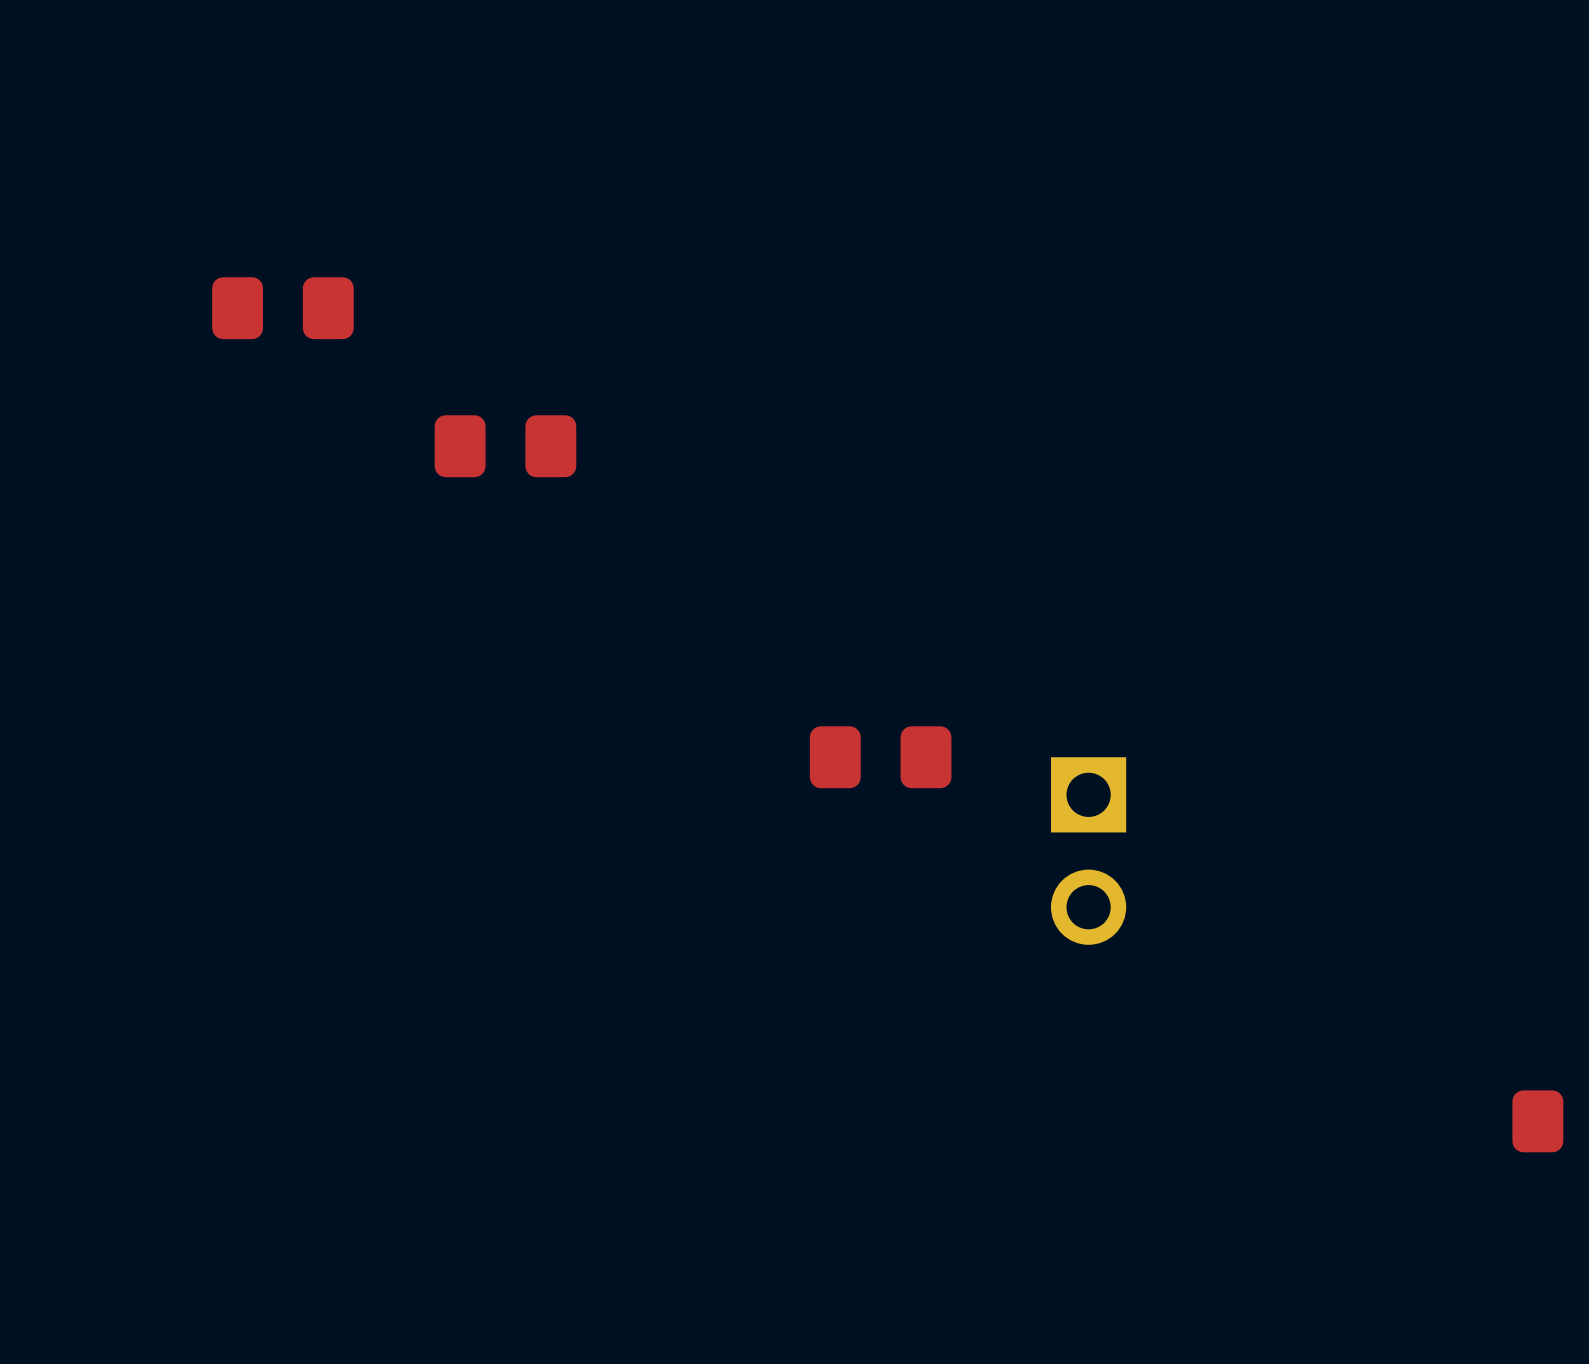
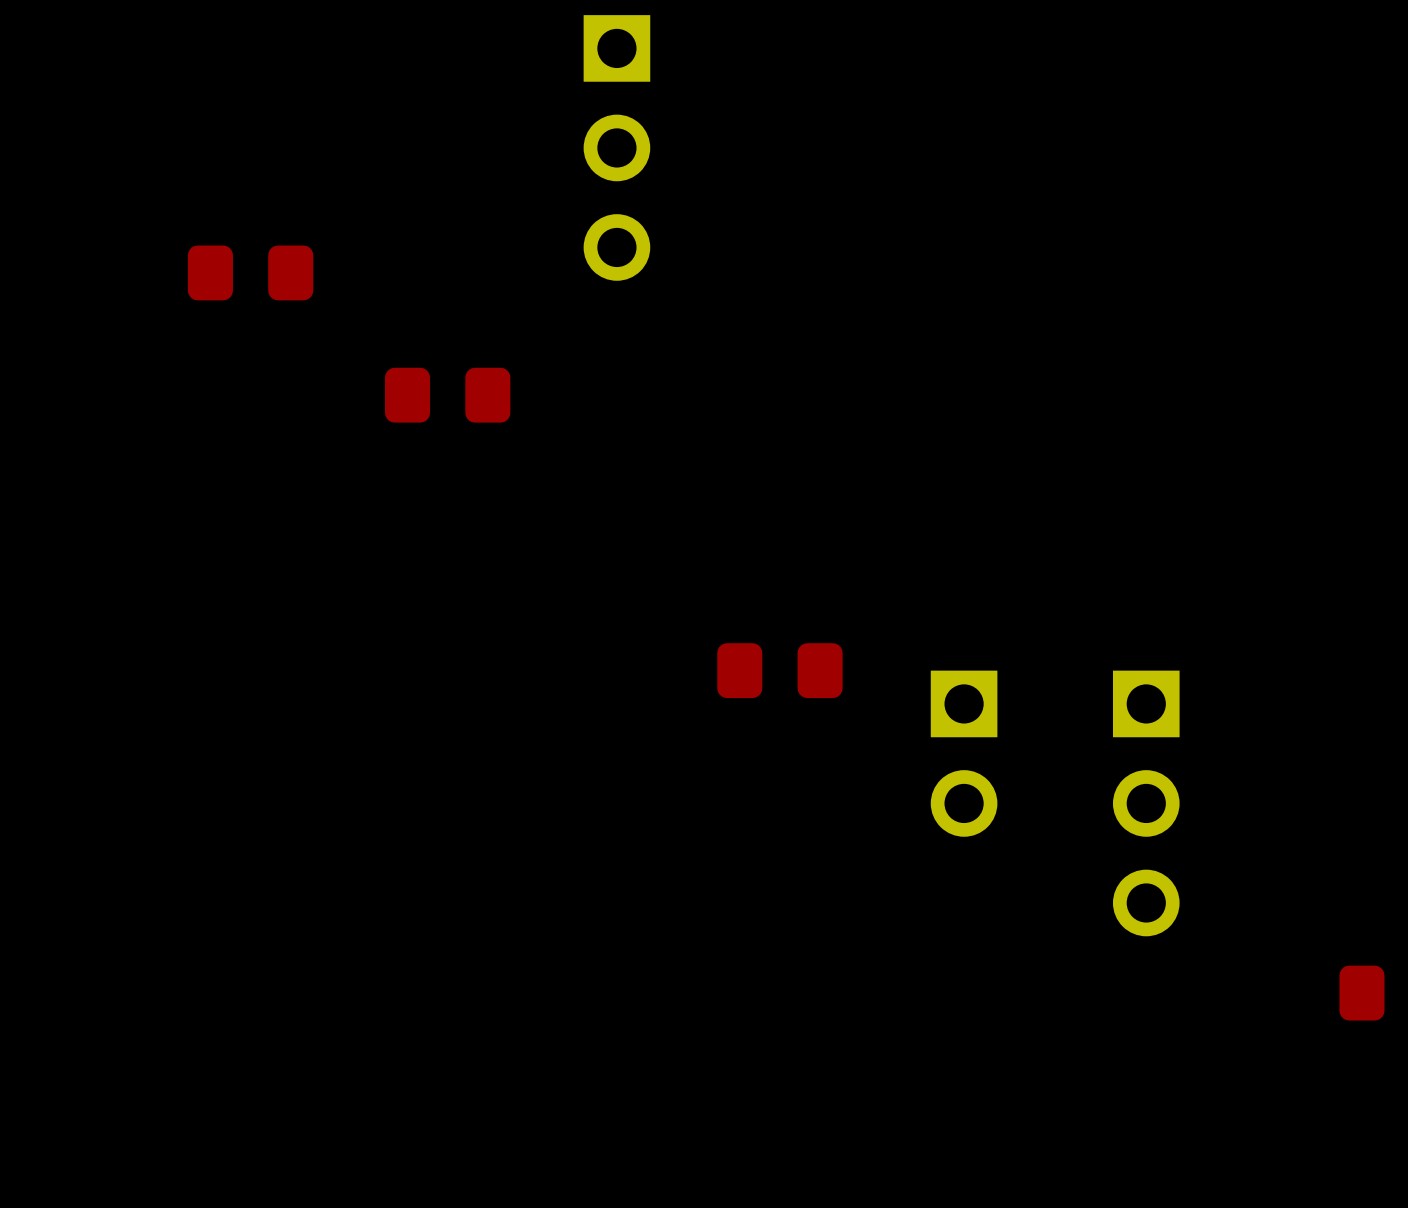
part: none -> (616, 147)
part: none -> (1146, 803)

